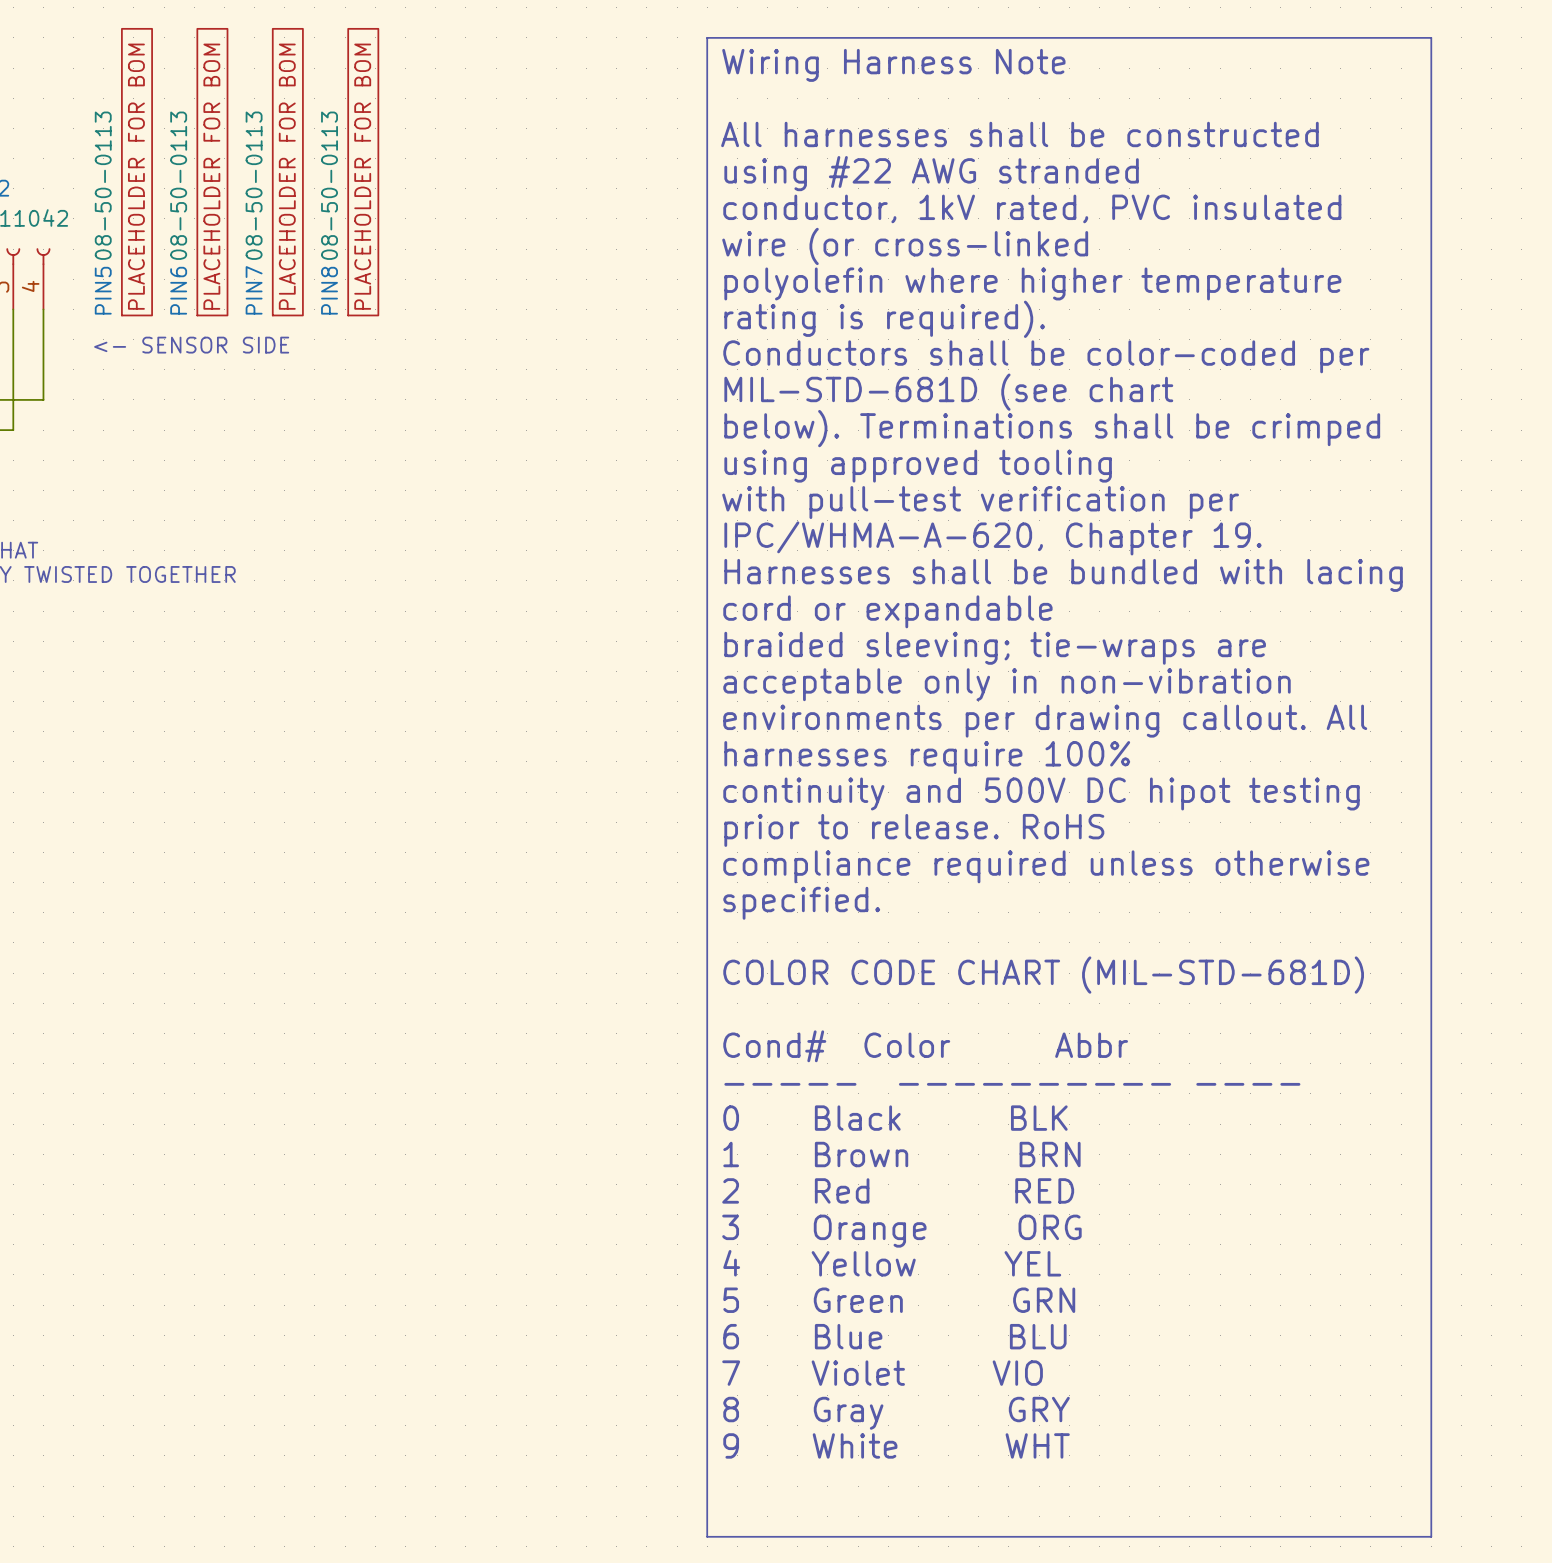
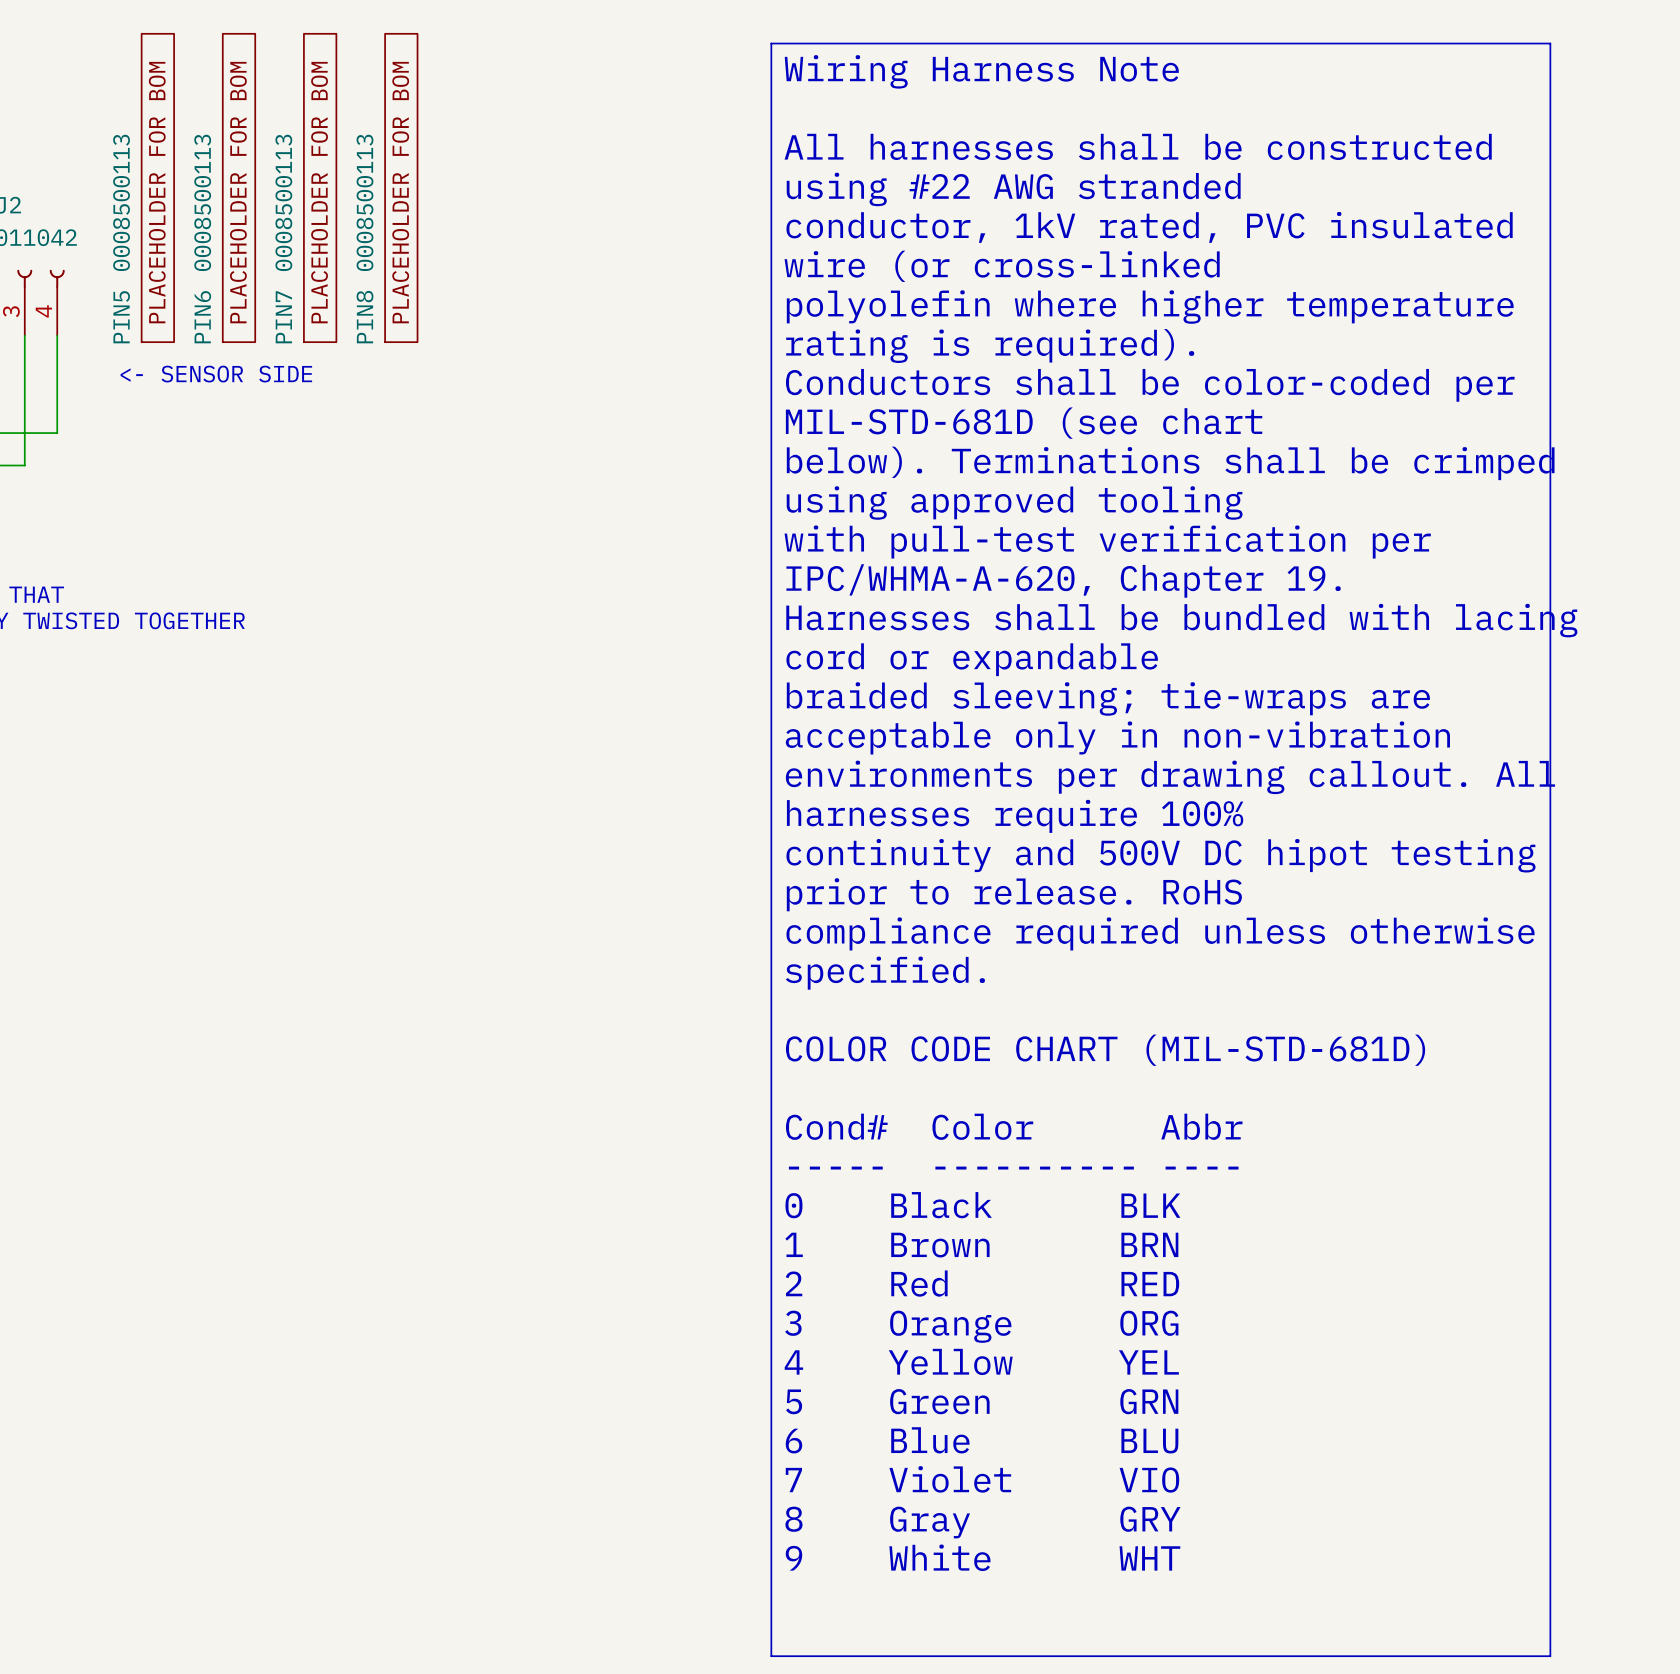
PIN5 value: 08-50-0113 (103, 185) -> 0008500113 (121, 202)
PIN6 value: 08-50-0113 (178, 185) -> 0008500113 (202, 202)
PIN7 value: 08-50-0113 (254, 185) -> 0008500113 (283, 202)
PIN8 value: 08-50-0113 (329, 185) -> 0008500113 (364, 202)

